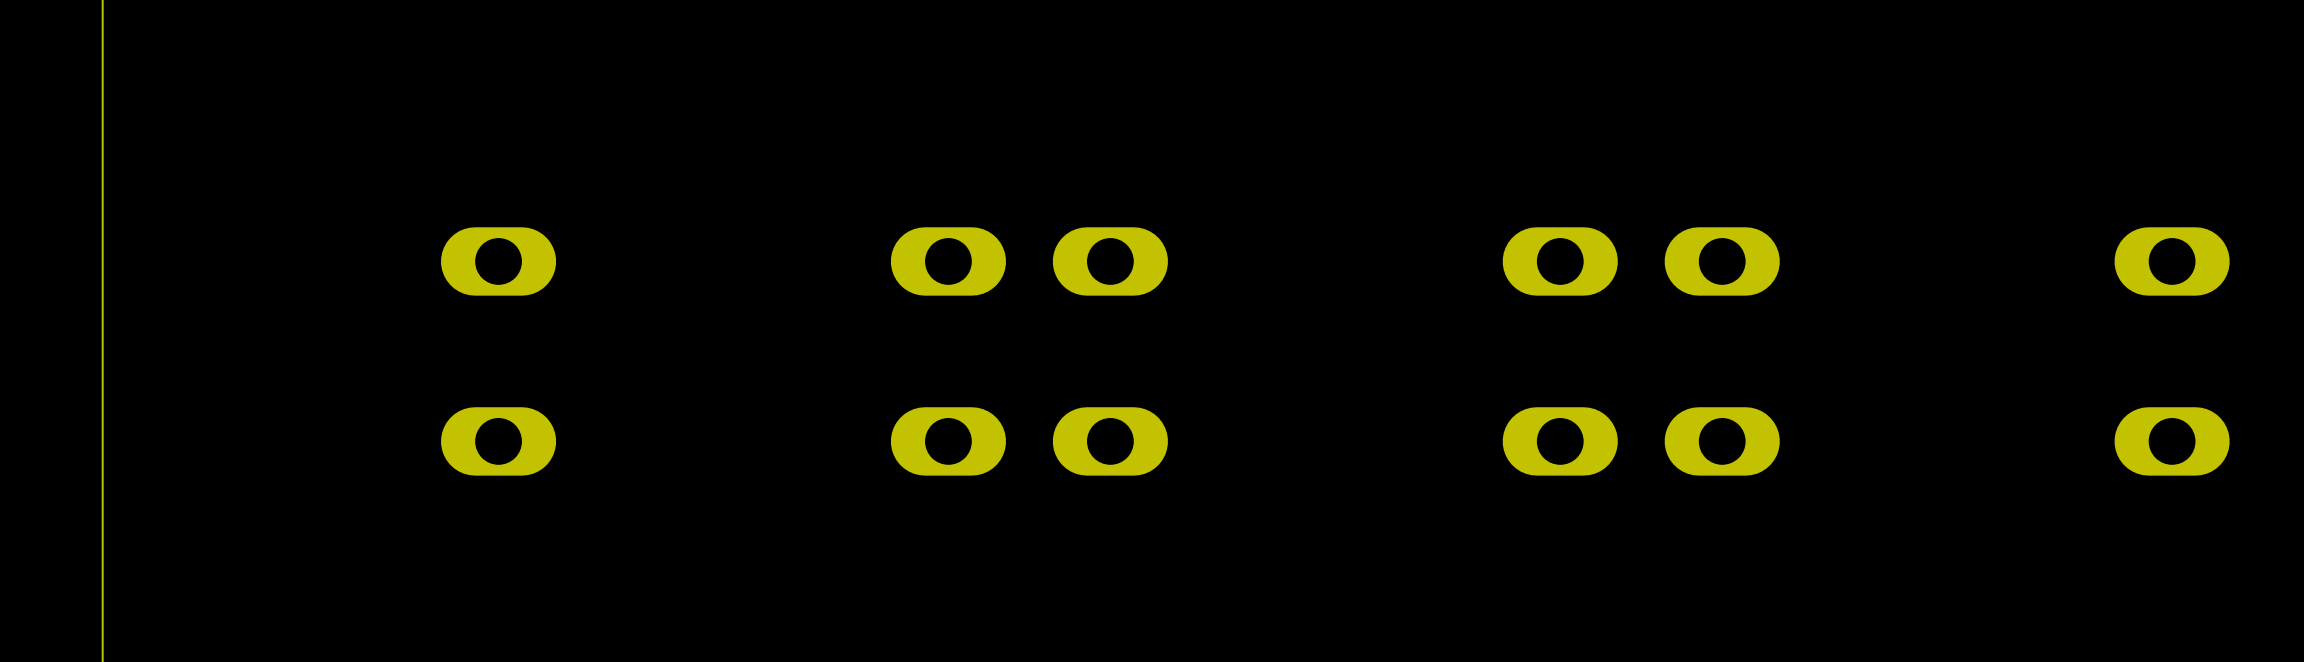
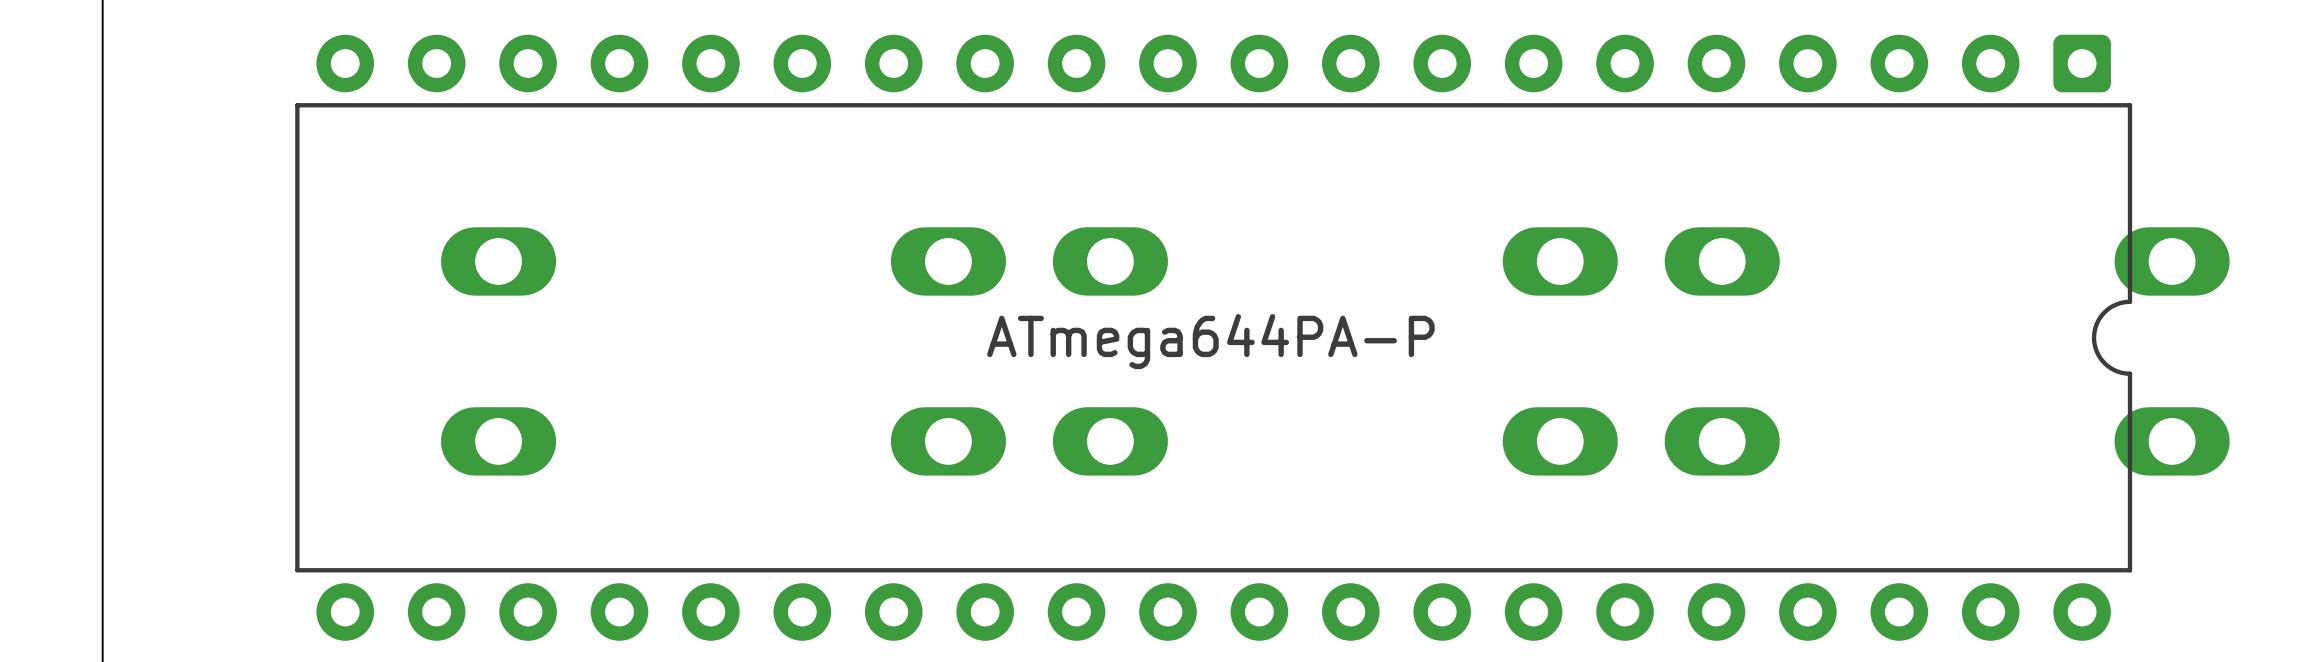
part: none -> ATmega644PA-P (1213, 337)

